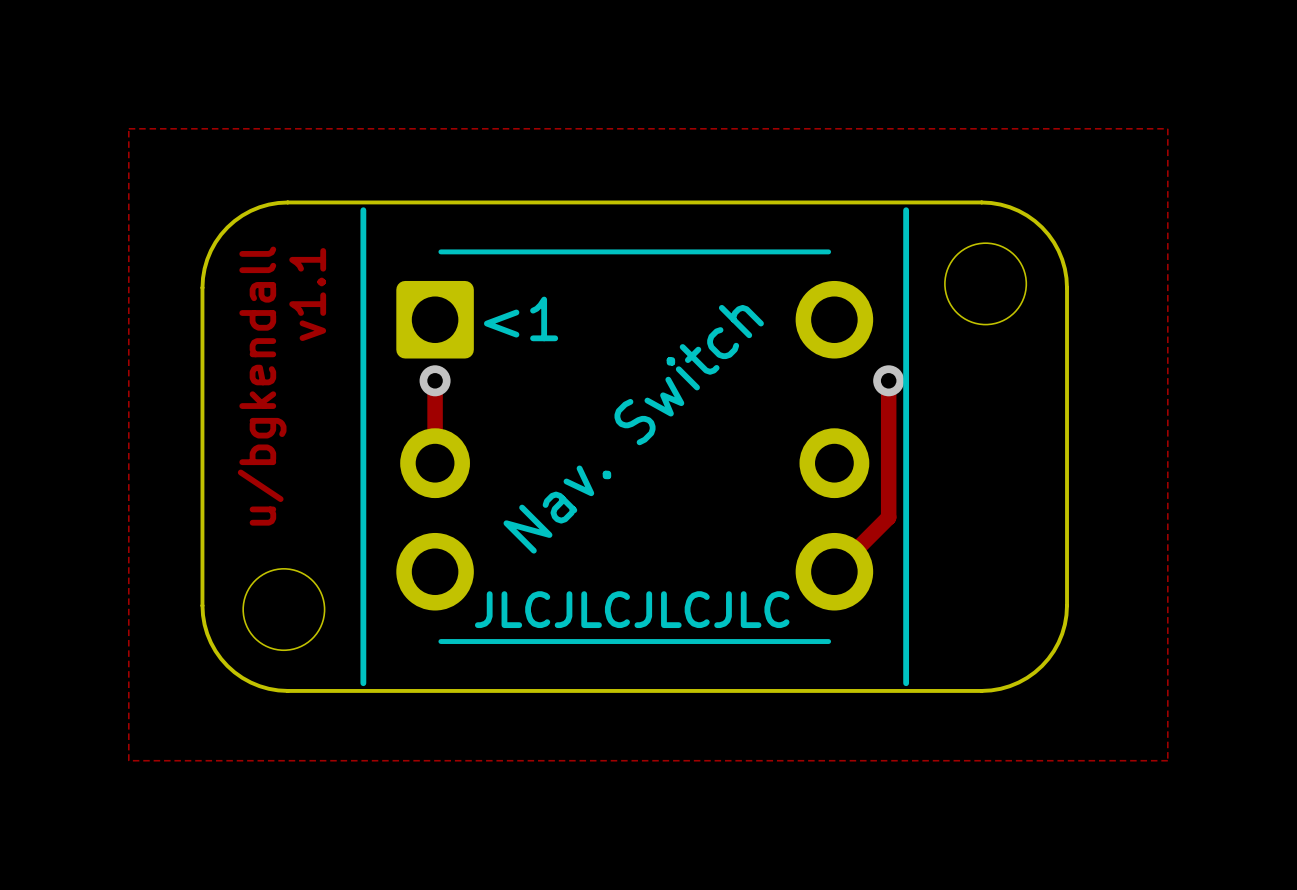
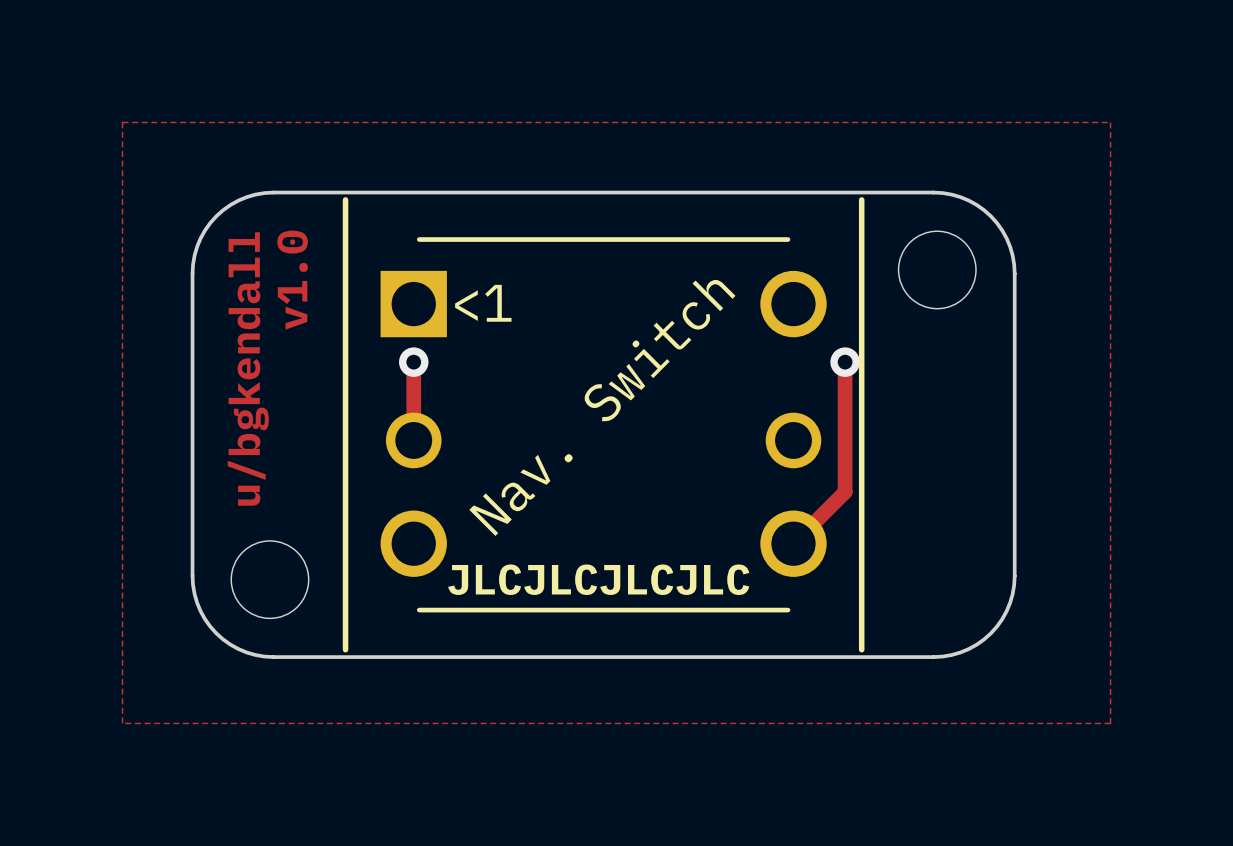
part footprint: [396, 249, 874, 644] -> [380, 237, 827, 613]
text: v1.1 (307, 294) -> v1.0 (292, 280)

